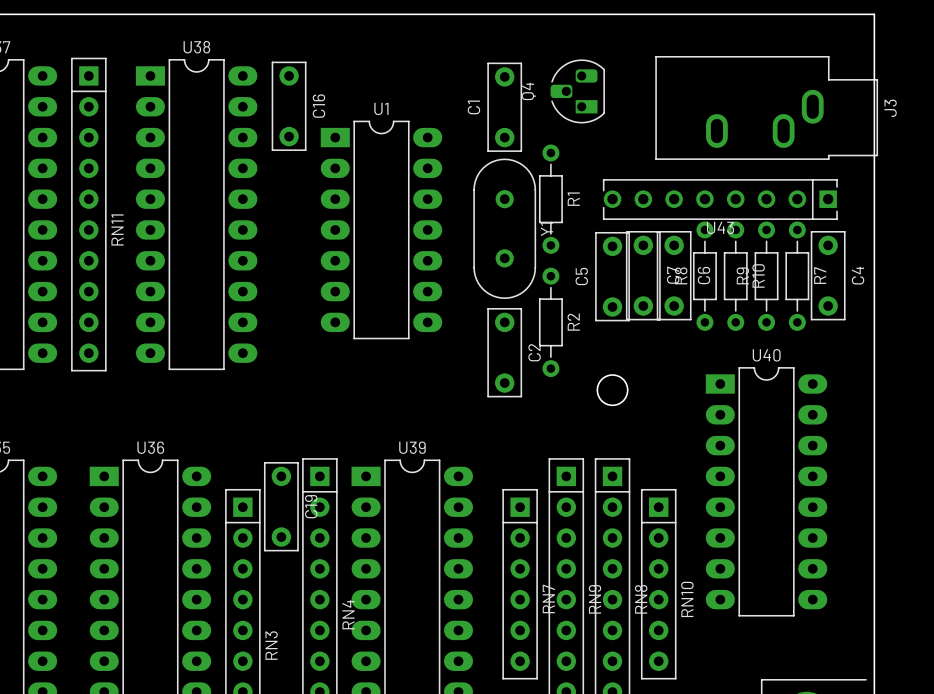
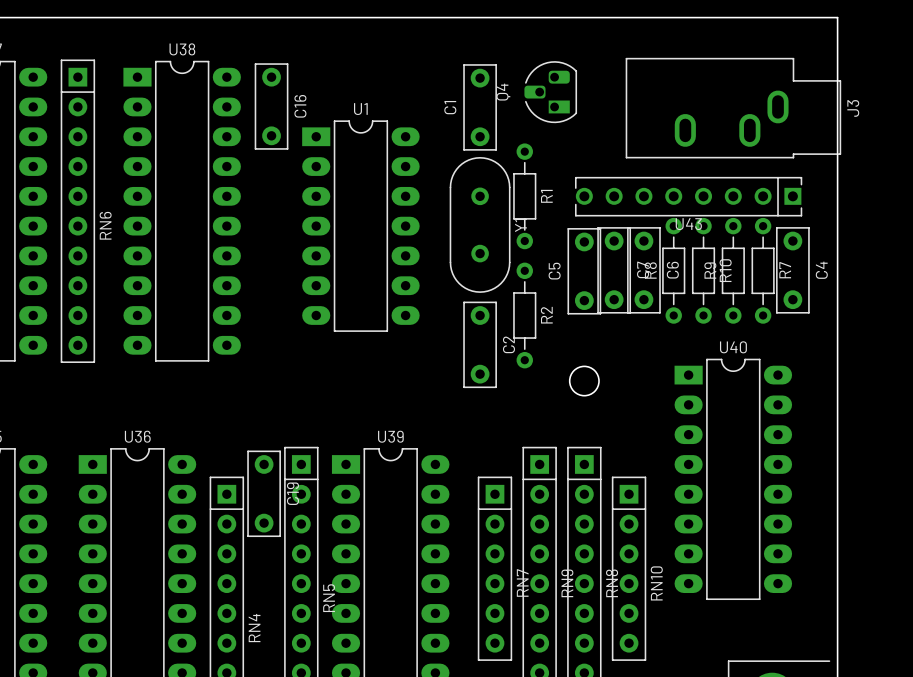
RN11 name: RN11 (117, 229) -> RN6 (105, 225)
RN4 name: RN4 (348, 614) -> RN5 (329, 598)
RN3 name: RN3 (271, 645) -> RN4 (254, 628)

